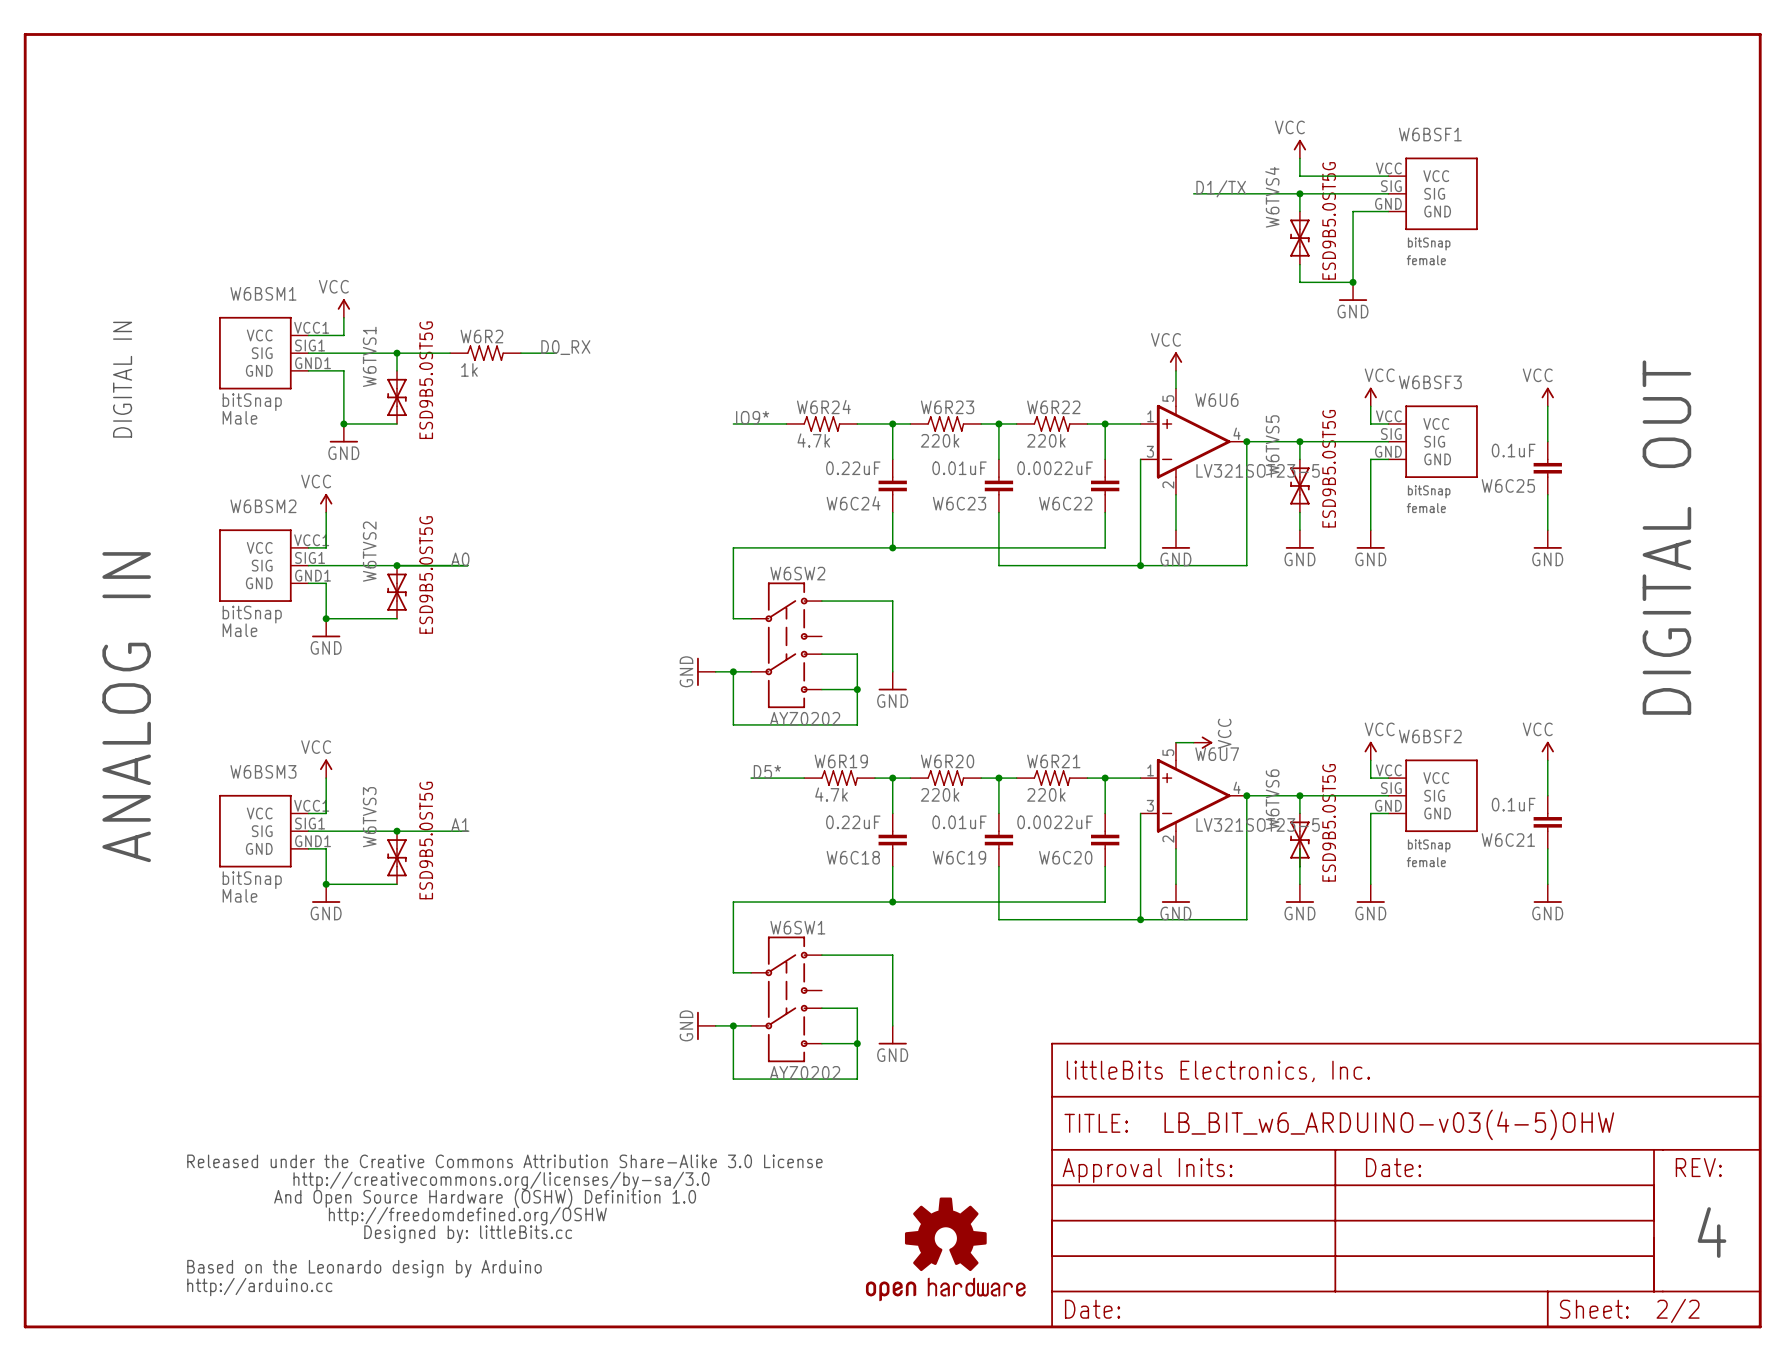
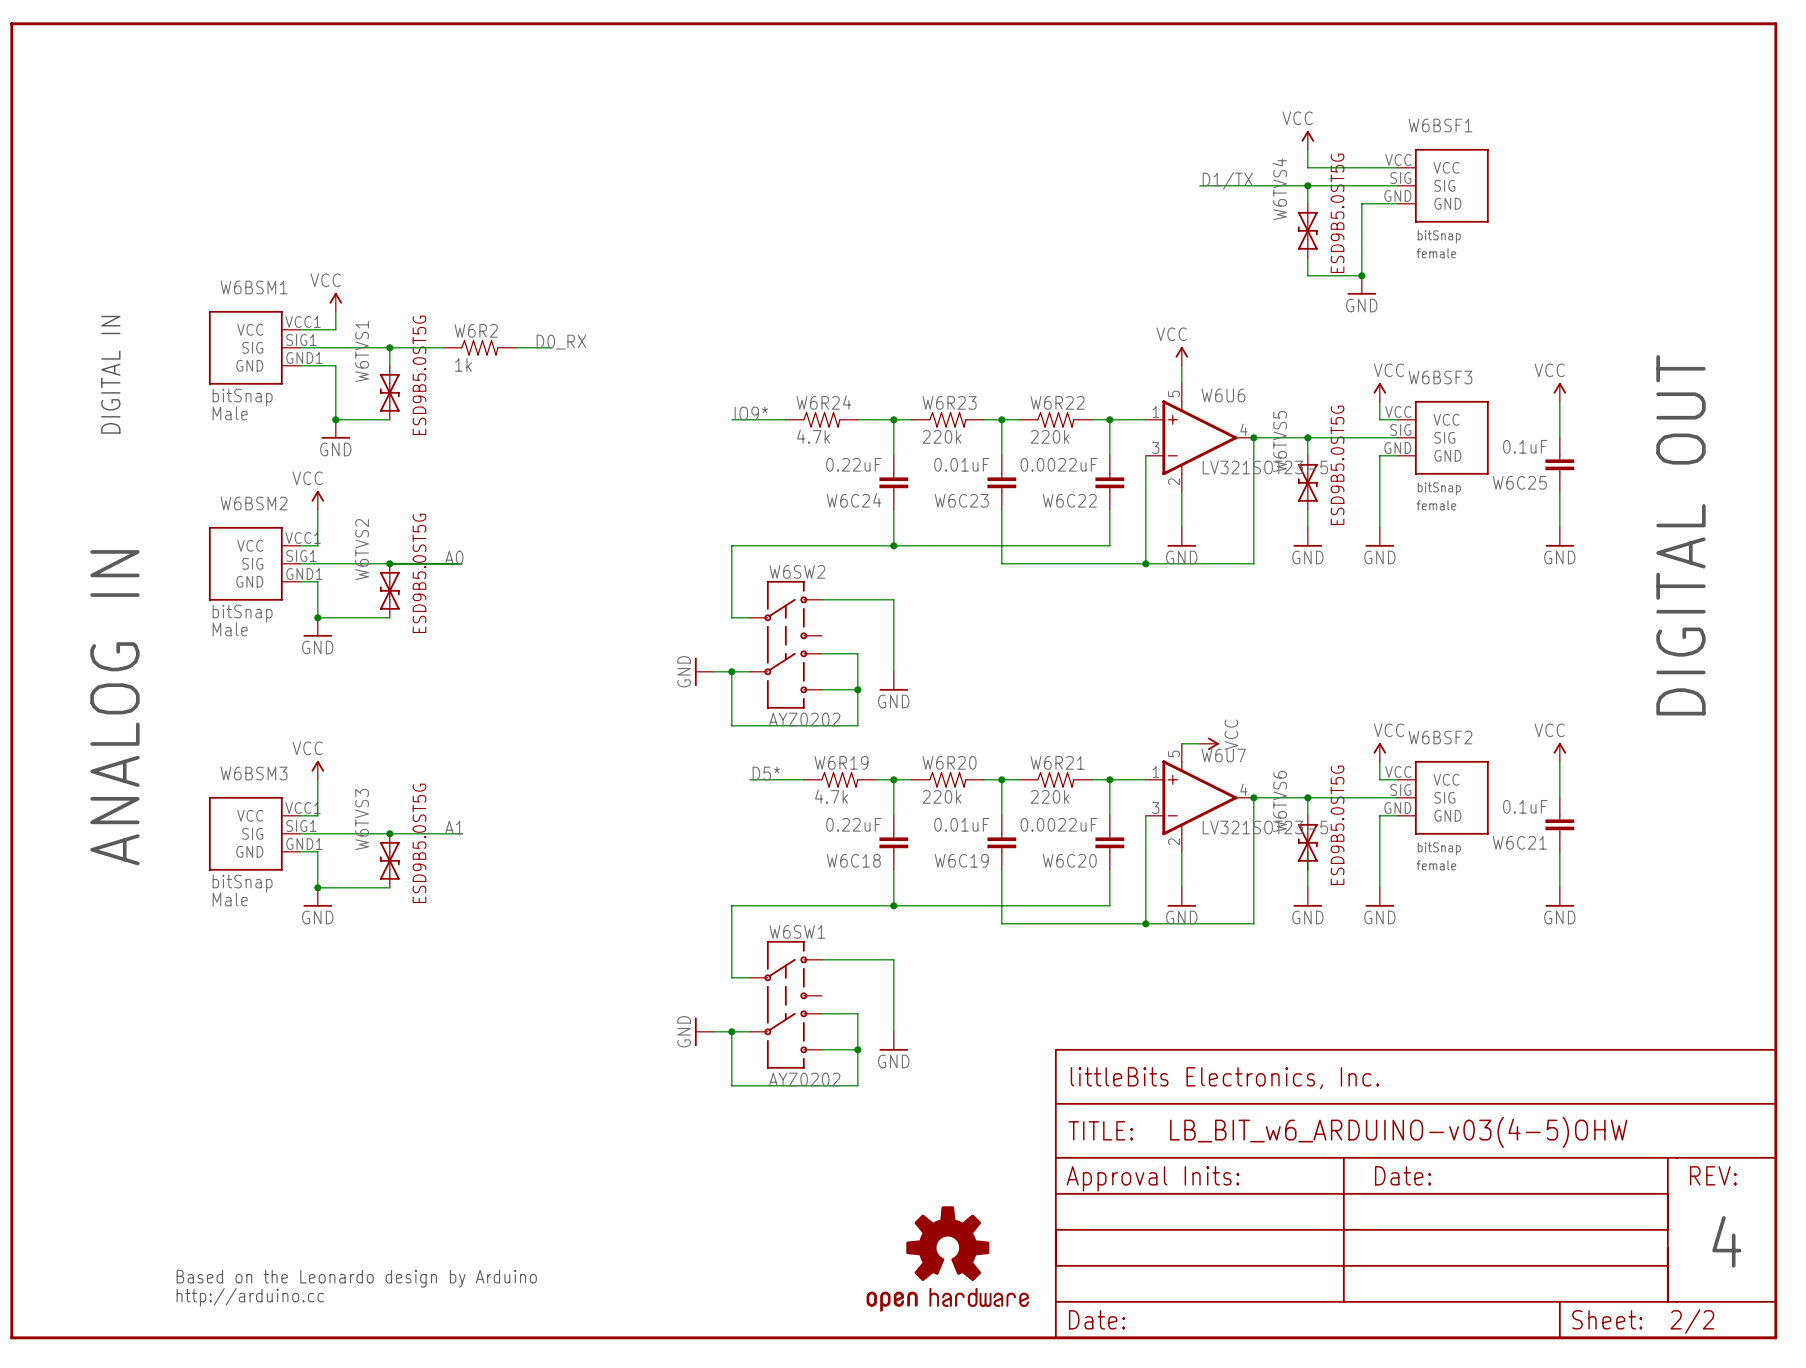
part: (504, 1198) -> none

